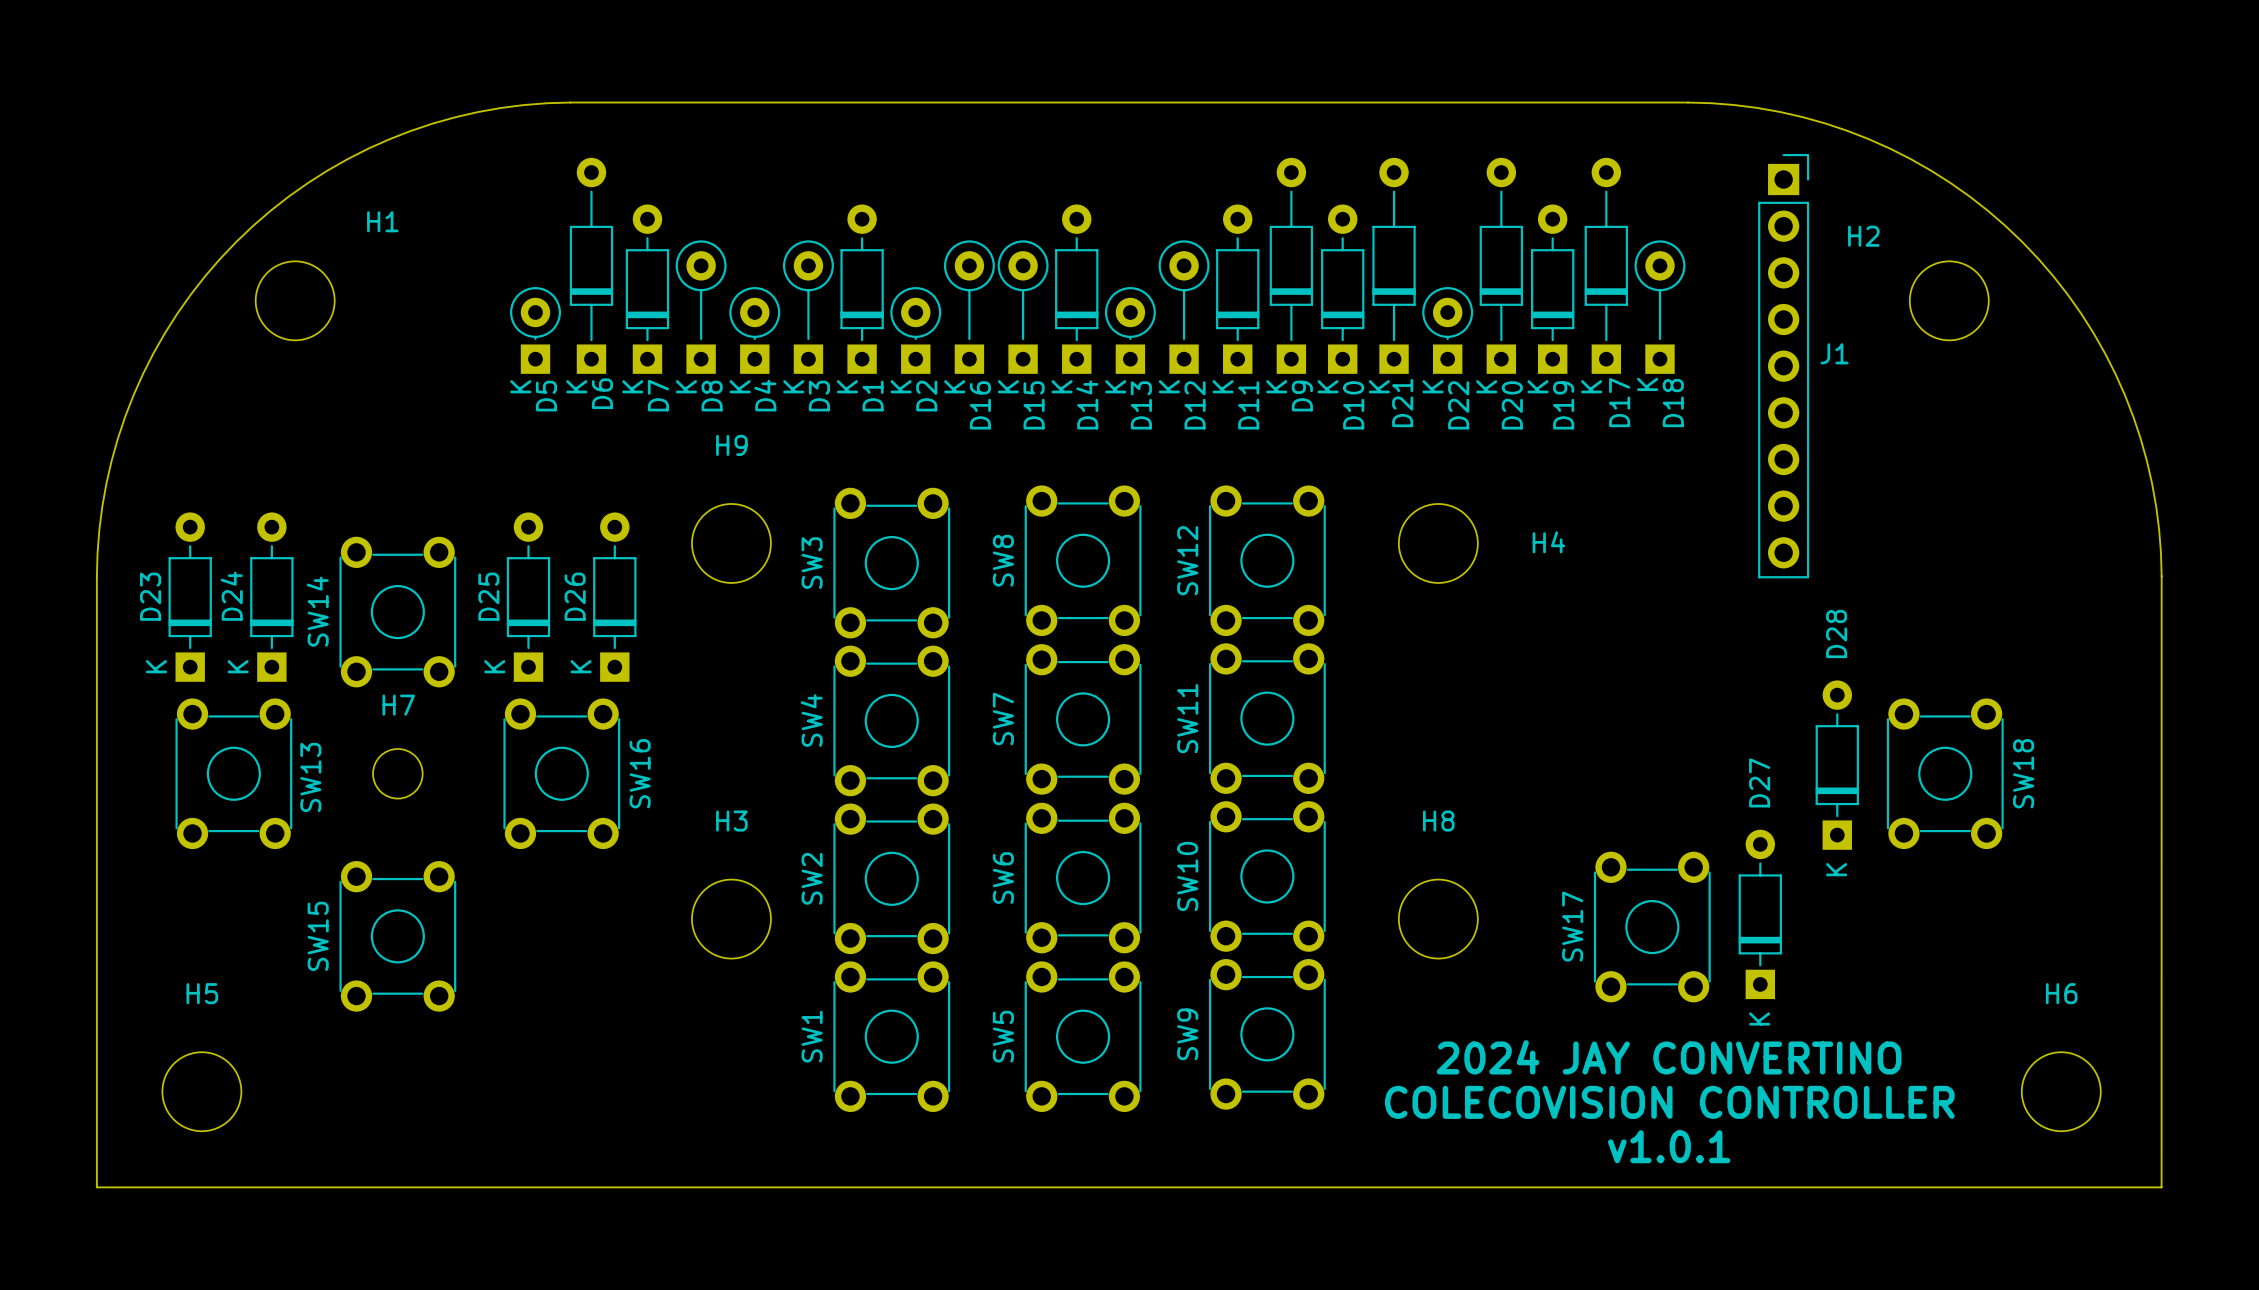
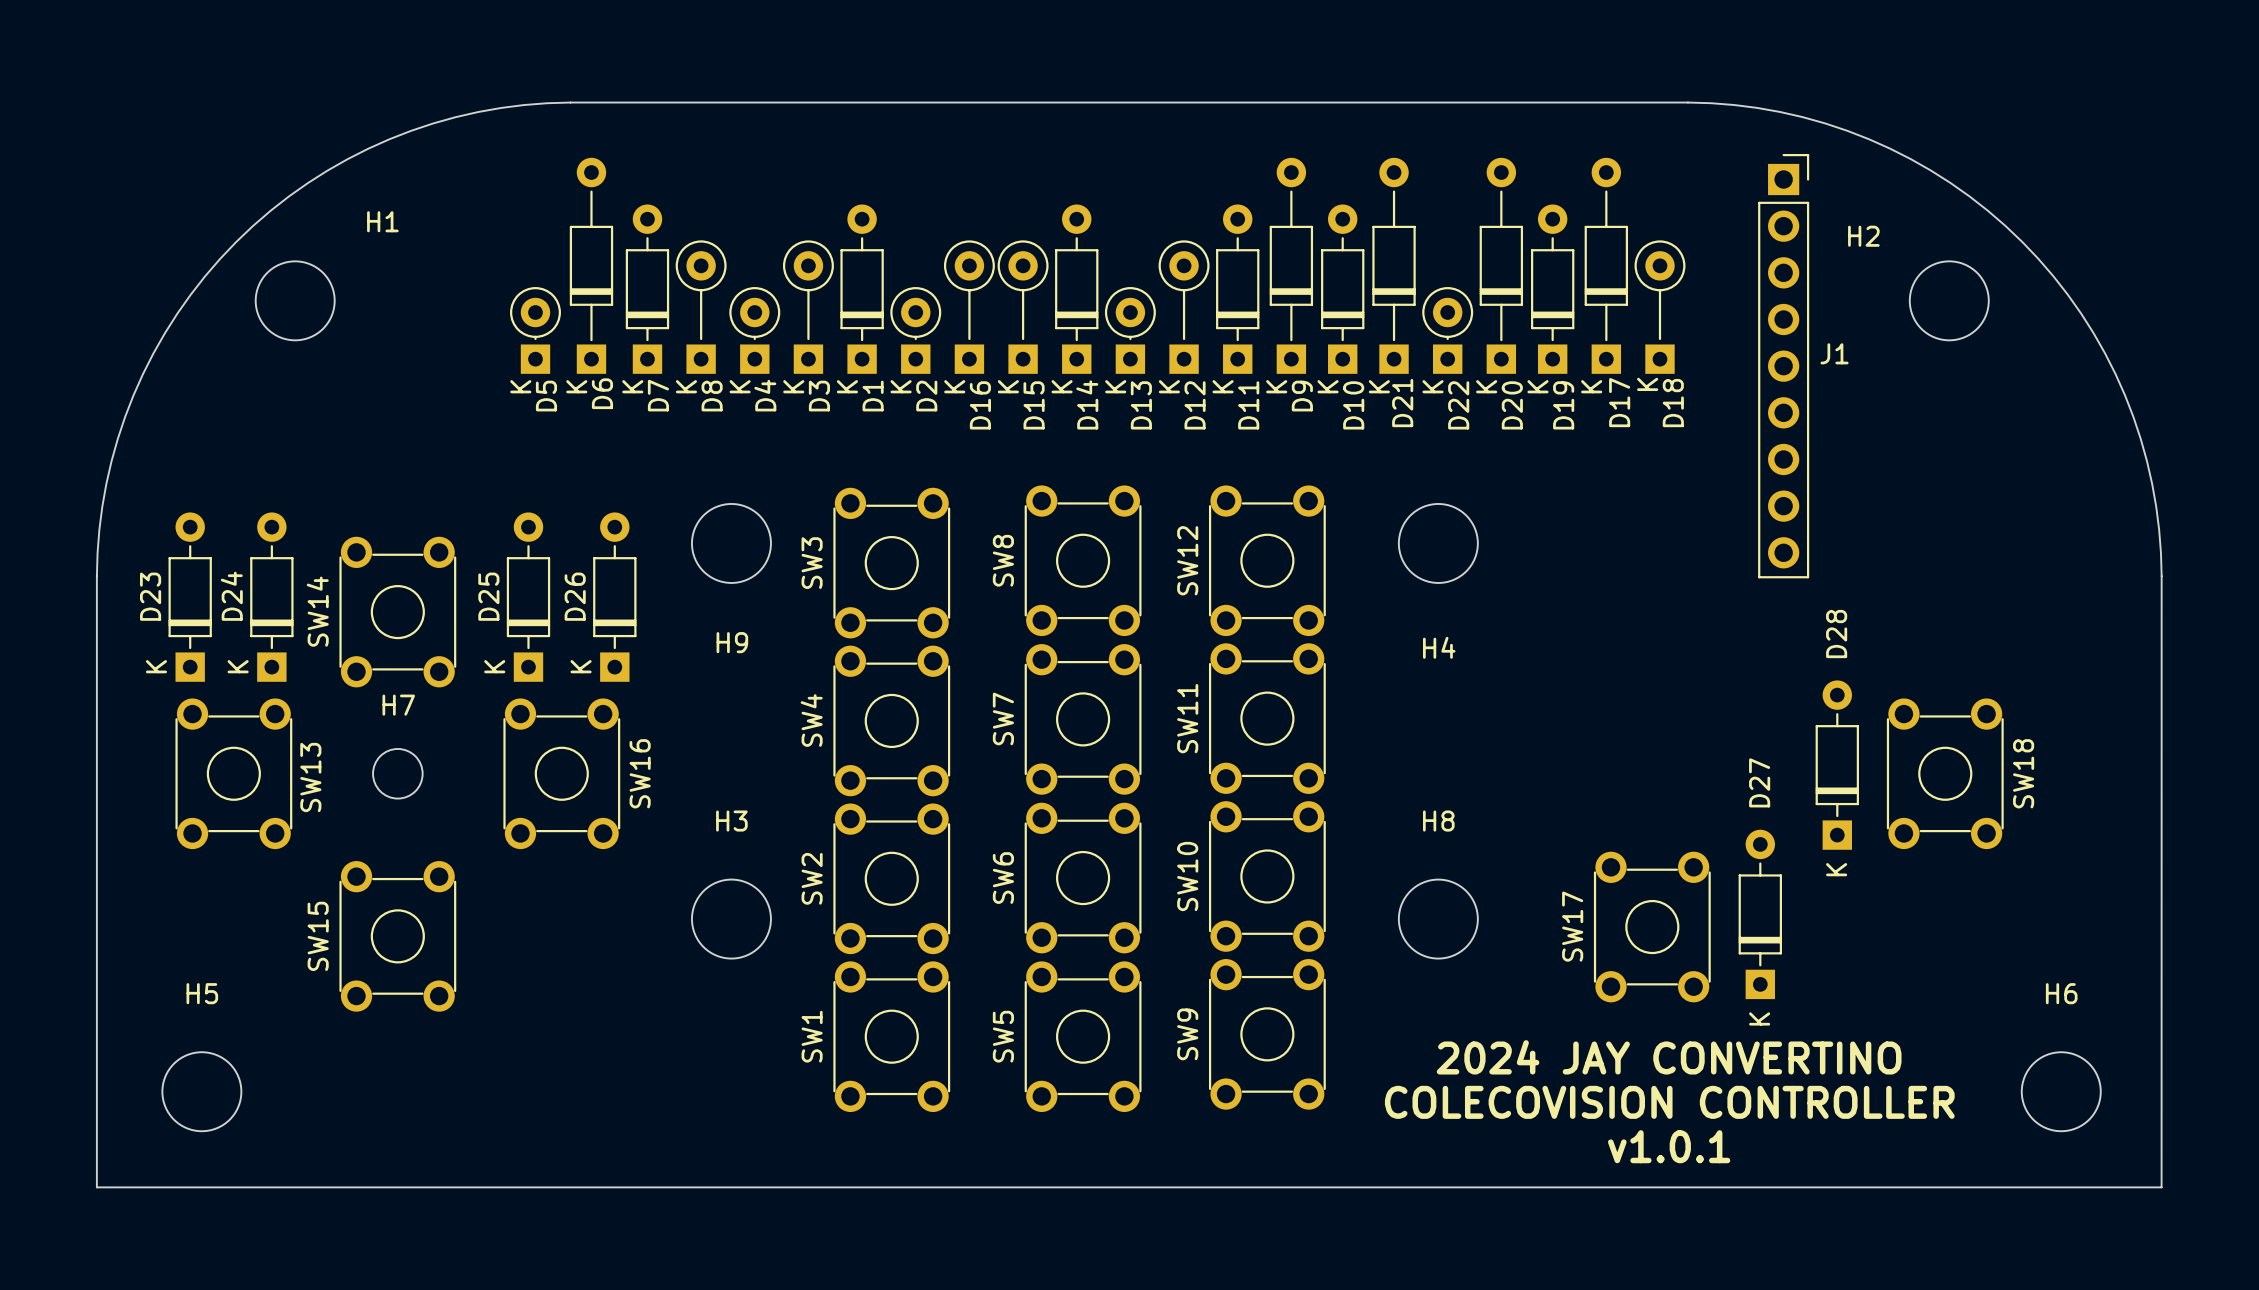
H9 name position: H9 (731, 445) -> H9 (732, 642)
H4 name position: H4 (1548, 542) -> H4 (1439, 647)

